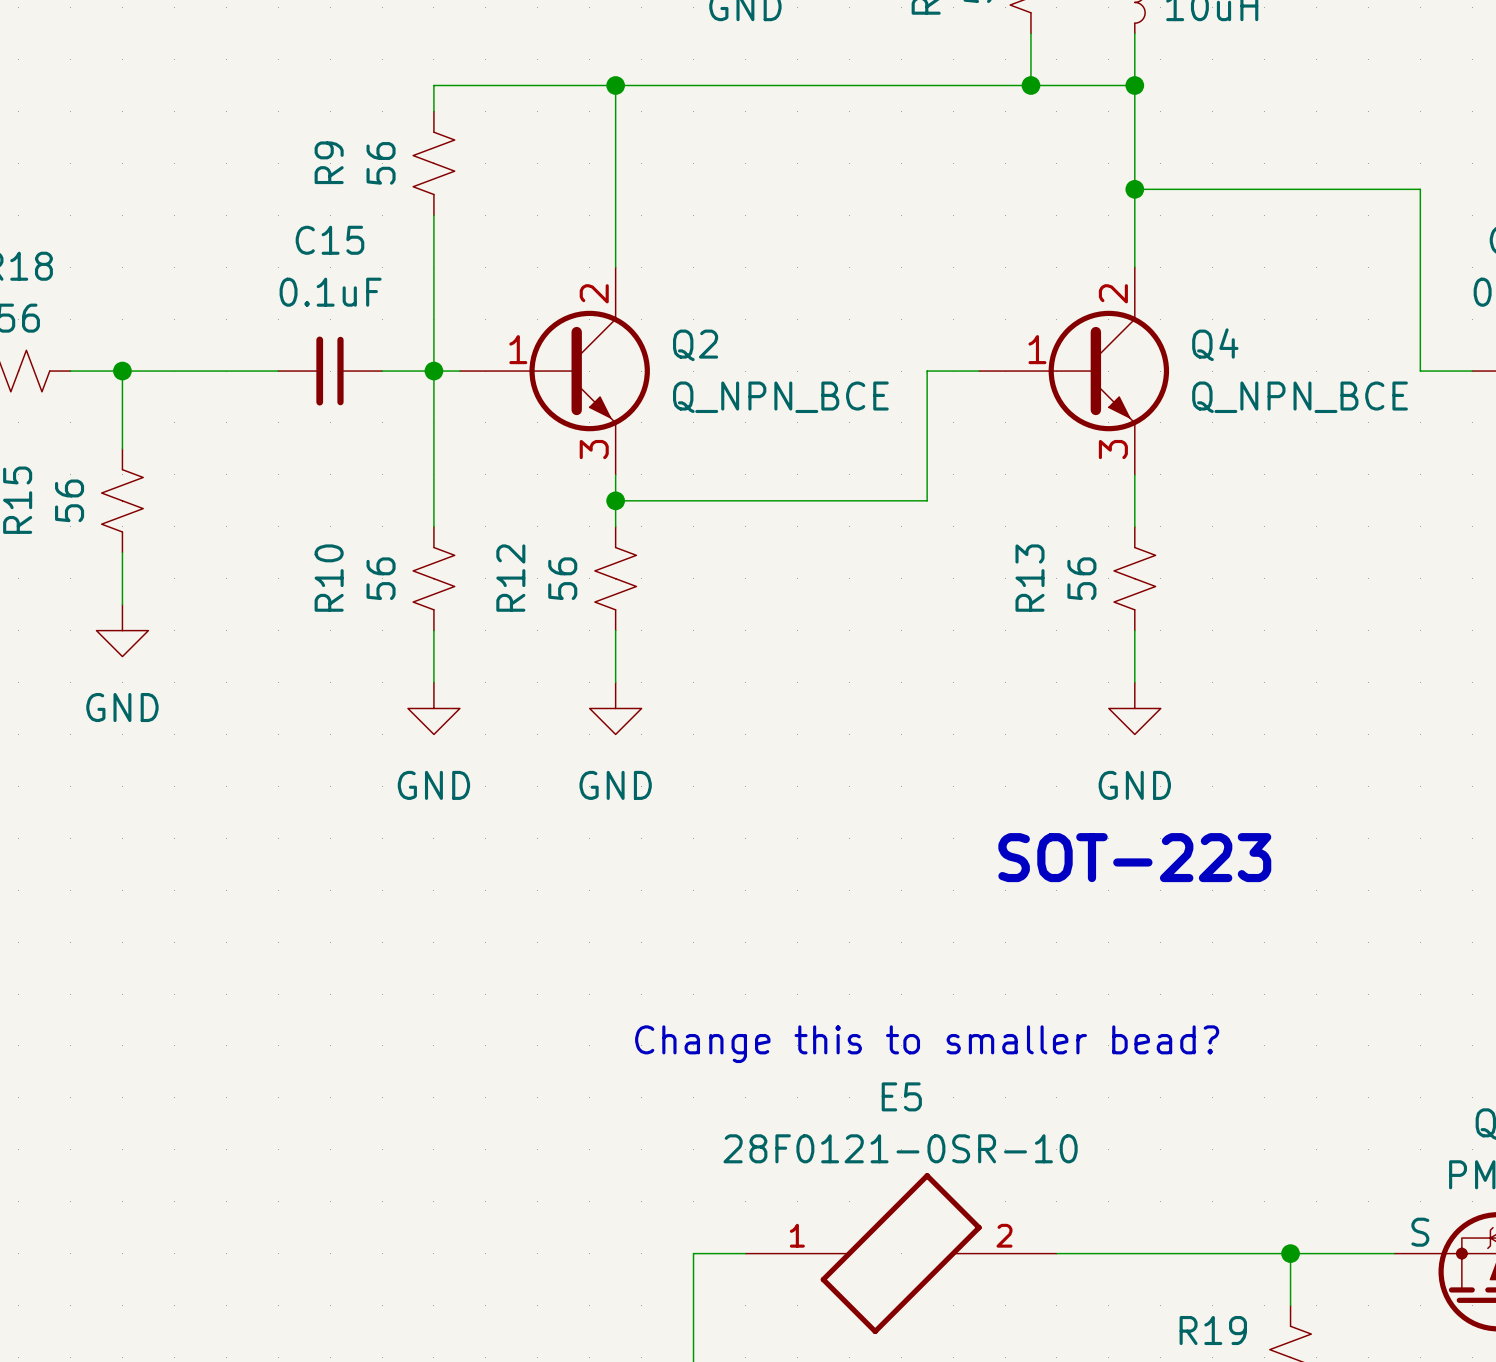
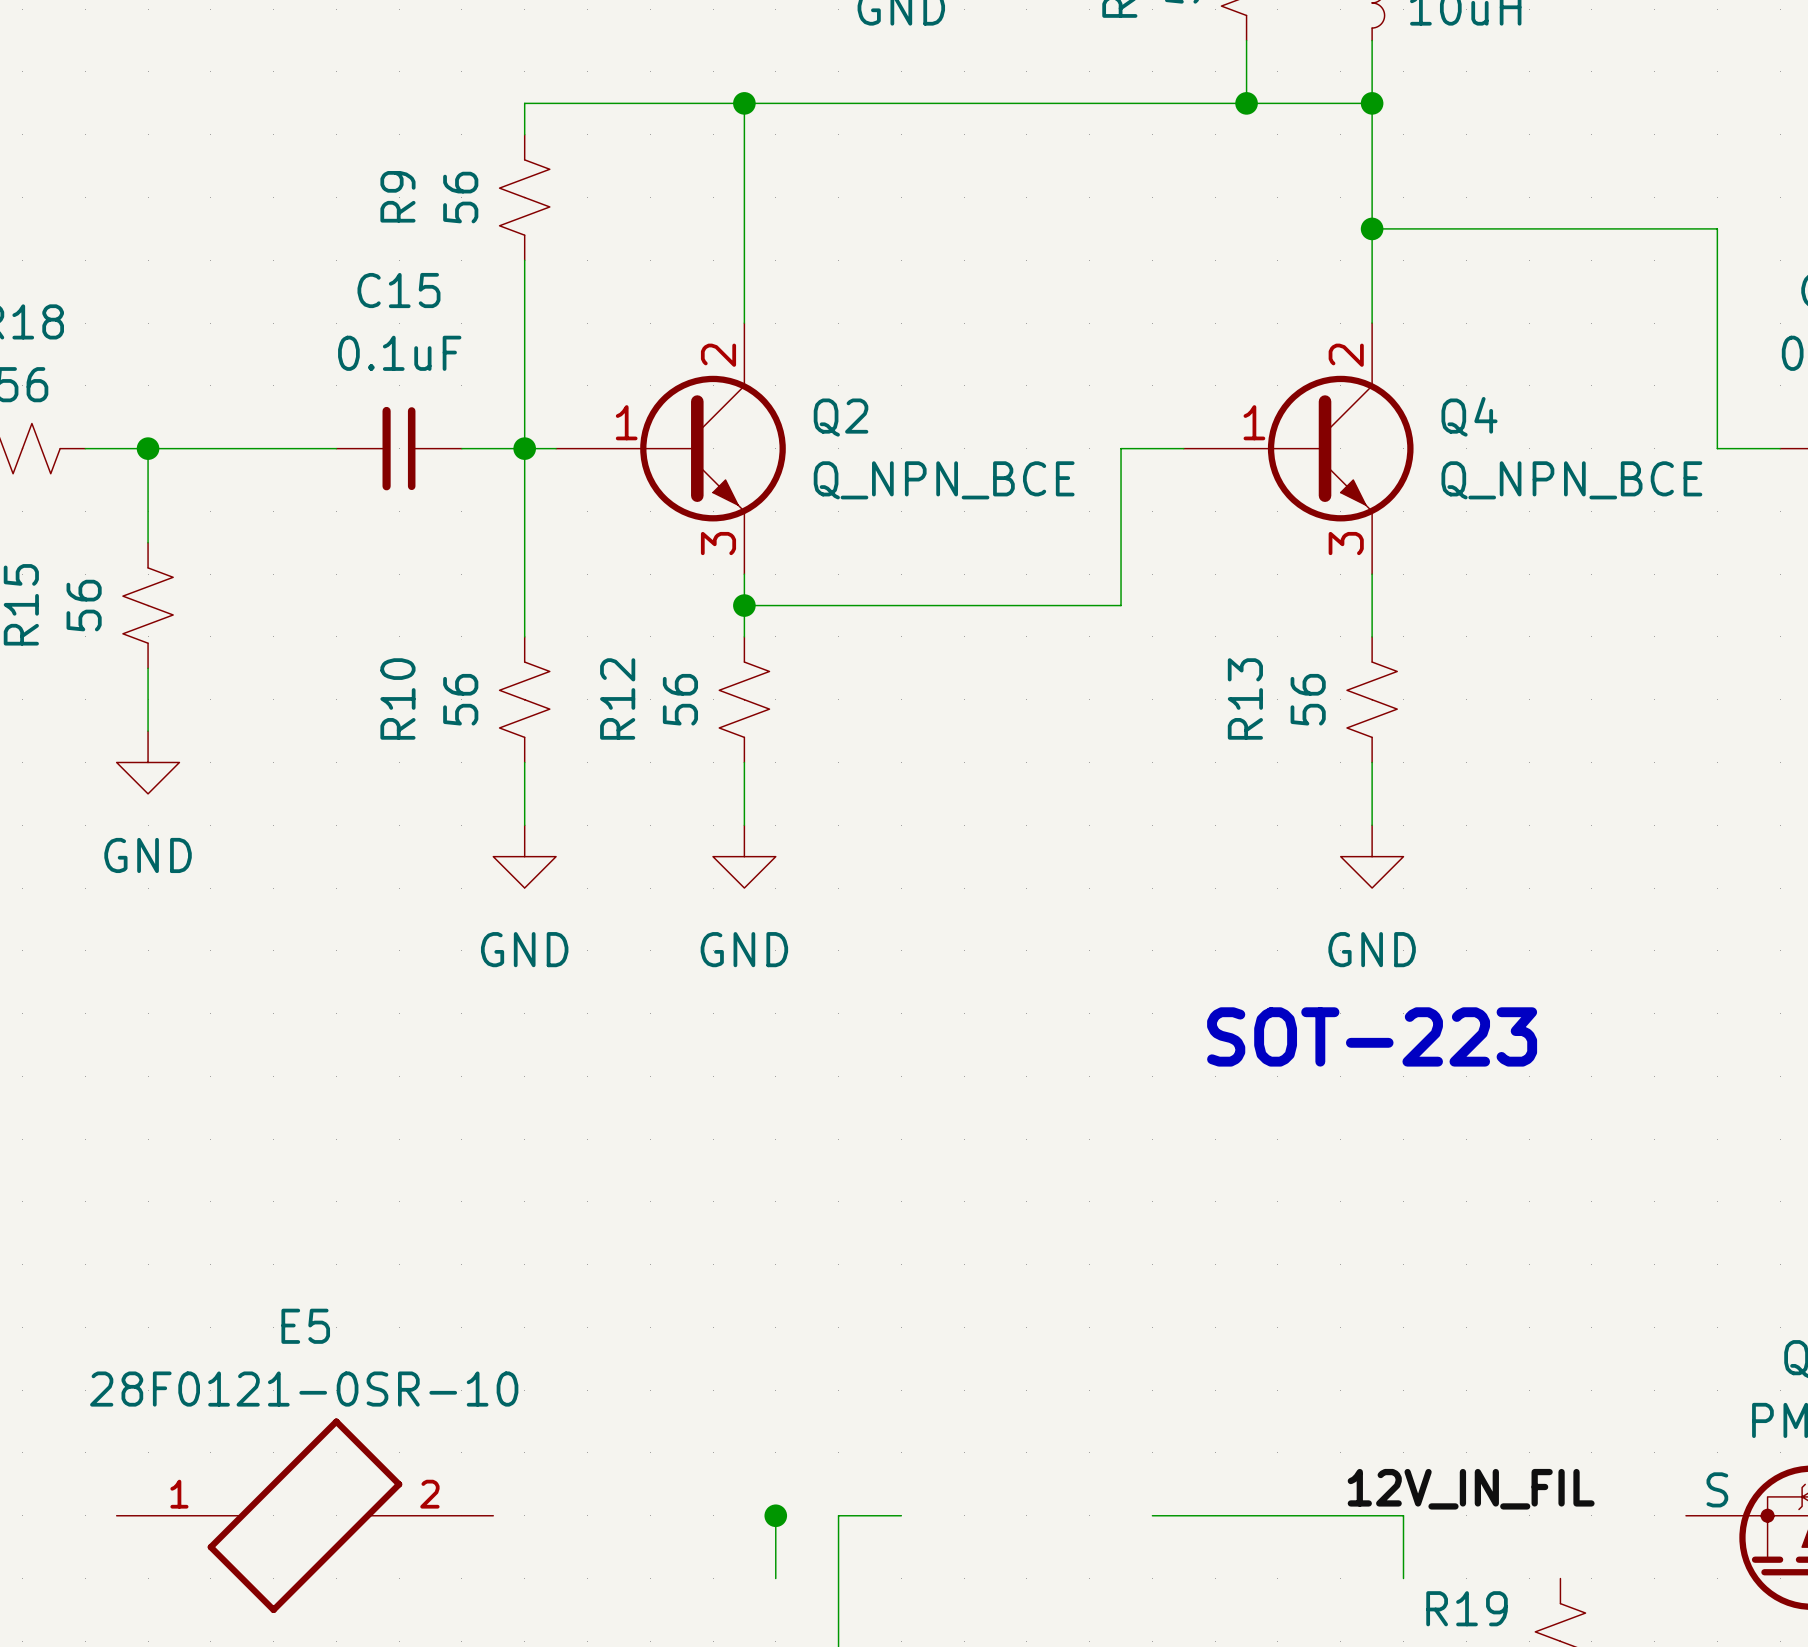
text: Change this to smaller bead? (927, 1044) -> none
label: none -> 12V_IN_FIL (1471, 1489)
wire: none -> (775, 1515) (775, 1578)
junction: none -> (775, 1515)
E5 position: (901, 1253) -> (304, 1515)
wire: (1160, 1253) (1394, 1253) -> (1403, 1515) (1403, 1578)
wire: (1290, 1253) (1290, 1305) -> none
junction: (1290, 1253) -> none

